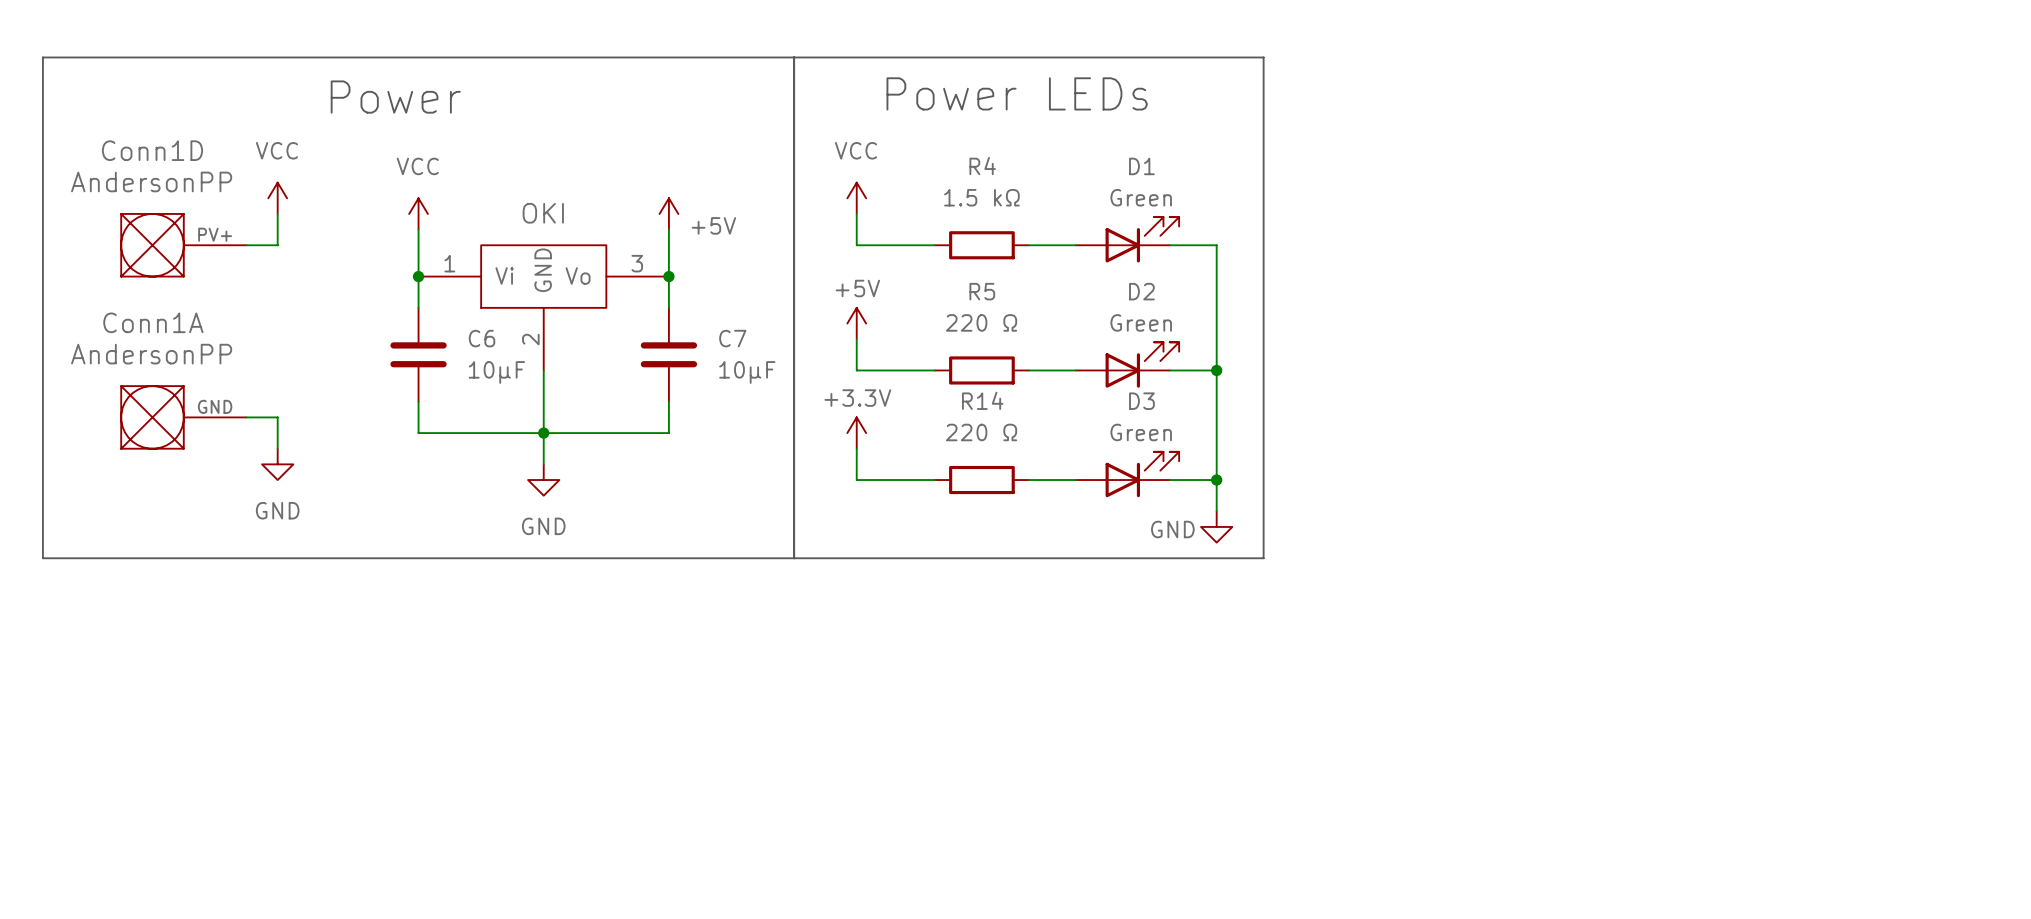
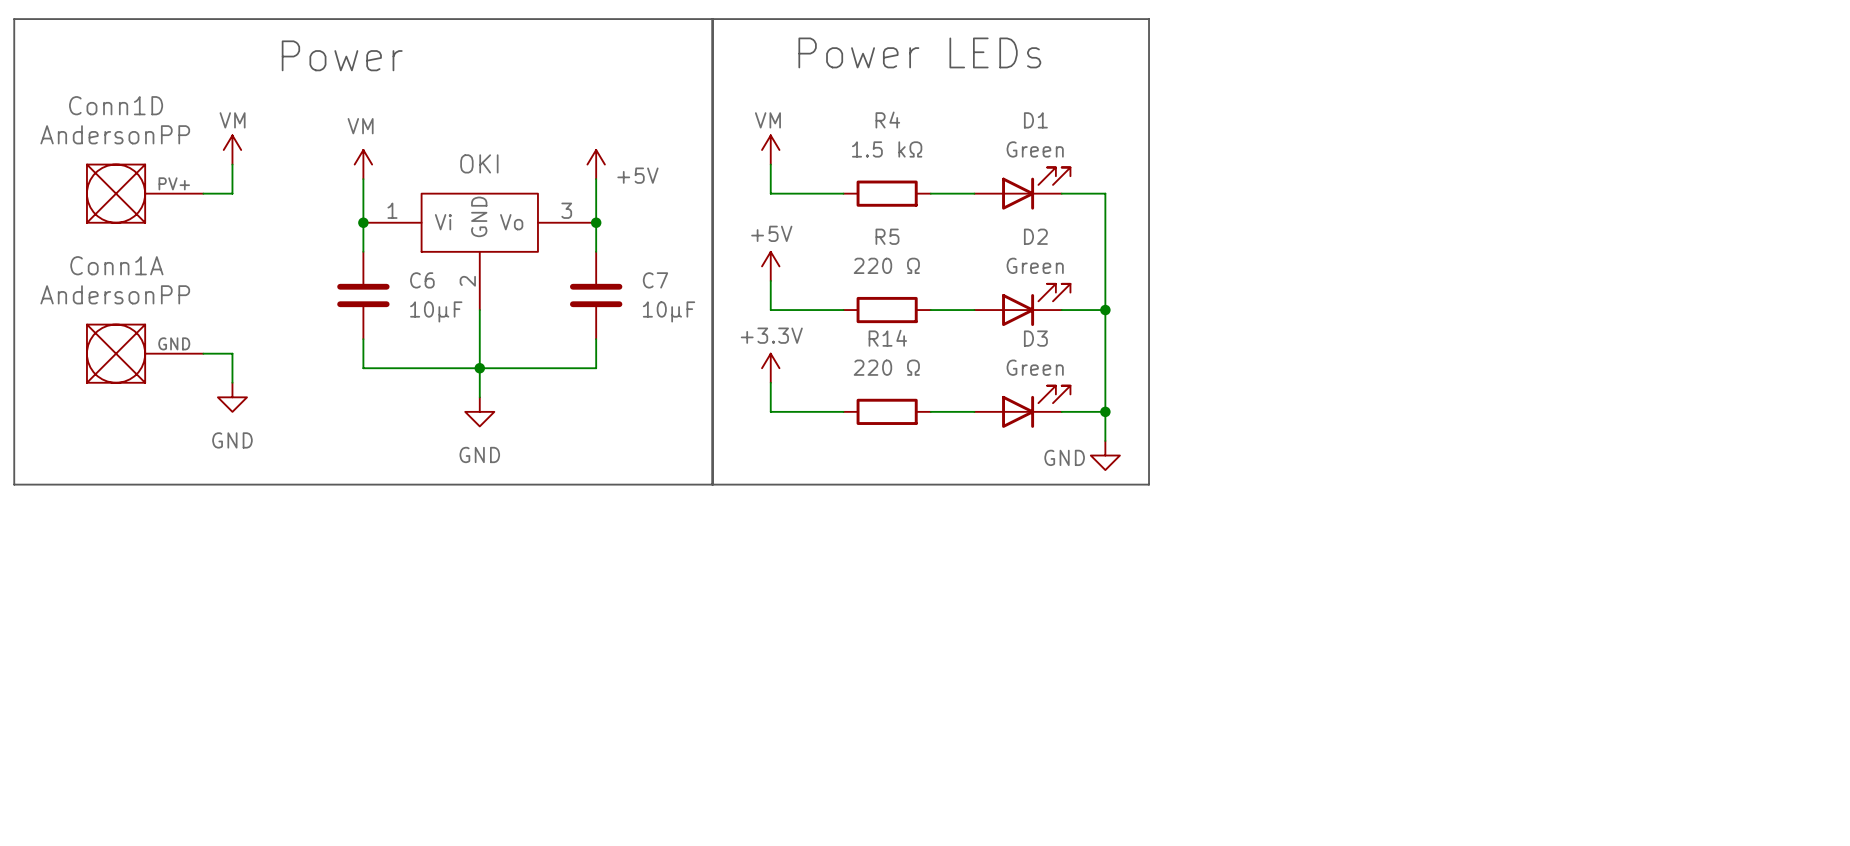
power symbol: VCC (277, 198) -> VM (232, 150)
power symbol: VCC (856, 198) -> VM (770, 150)
power symbol: VCC (418, 213) -> VM (363, 164)

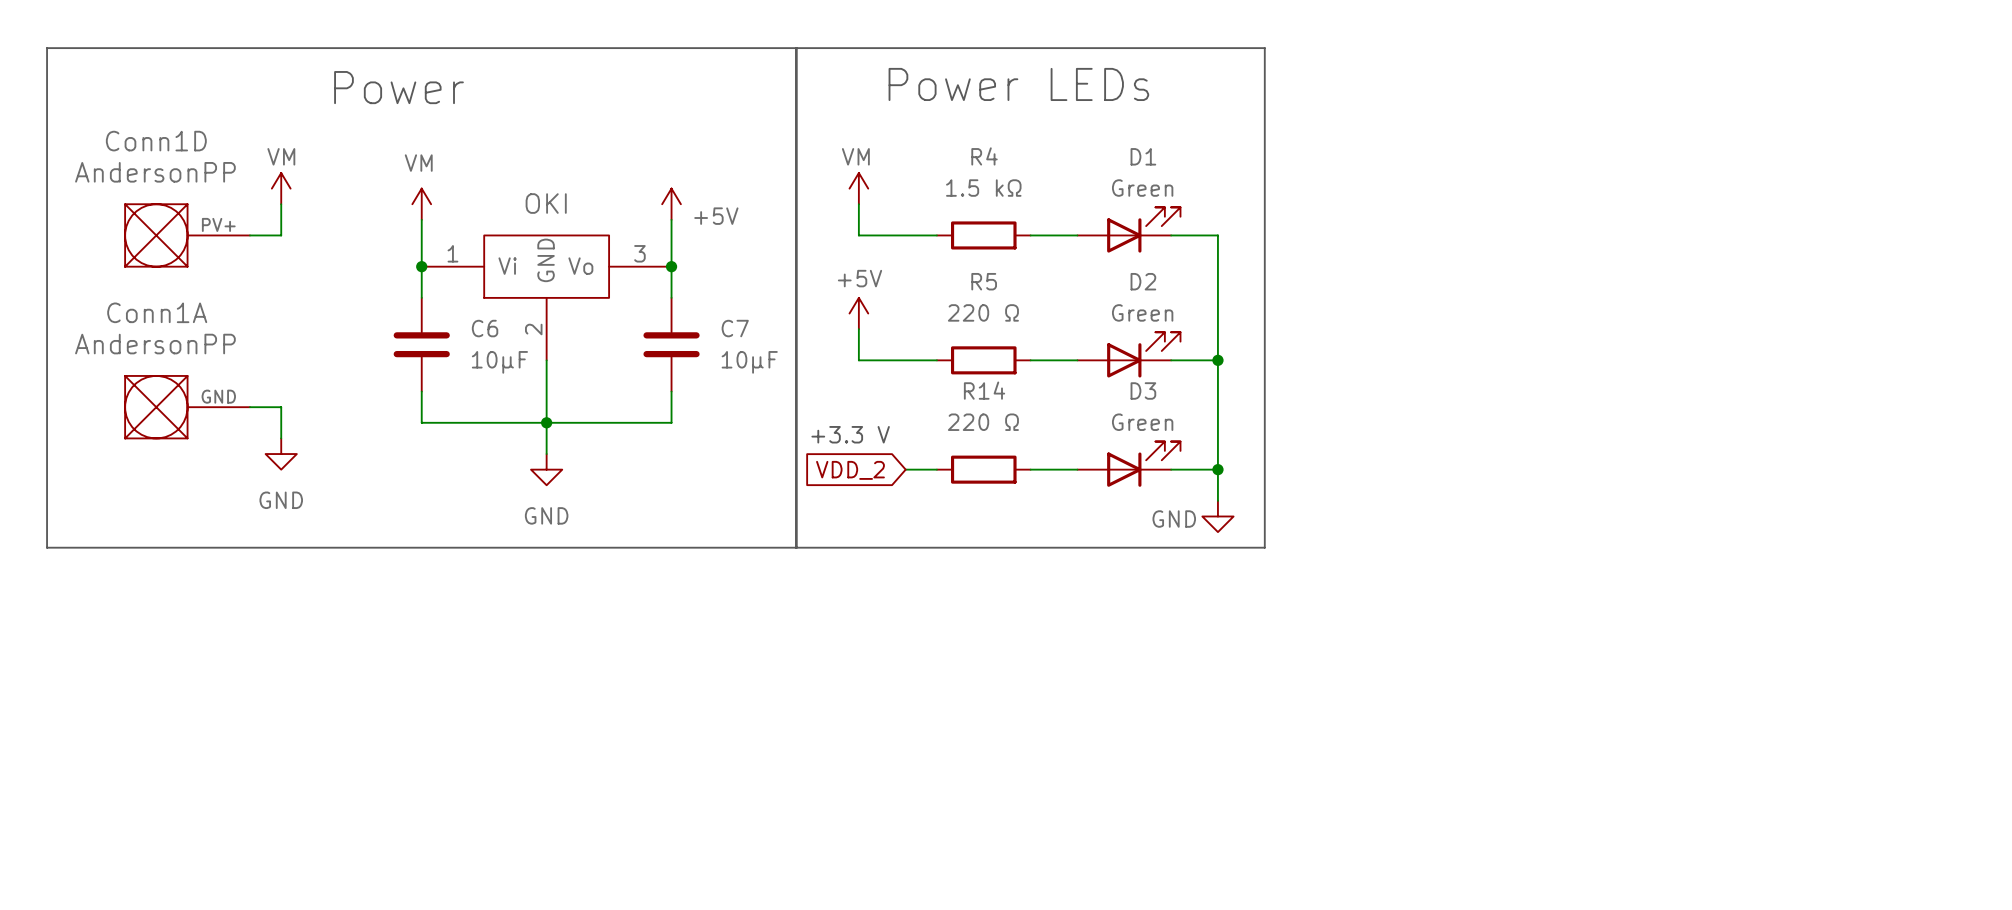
power symbol: +3.3V (770, 368) -> none
text: none -> +3.3 V (850, 434)
wire: (770, 382) (770, 411) (814, 411) -> none
global label: none -> VDD_2 (850, 470)

